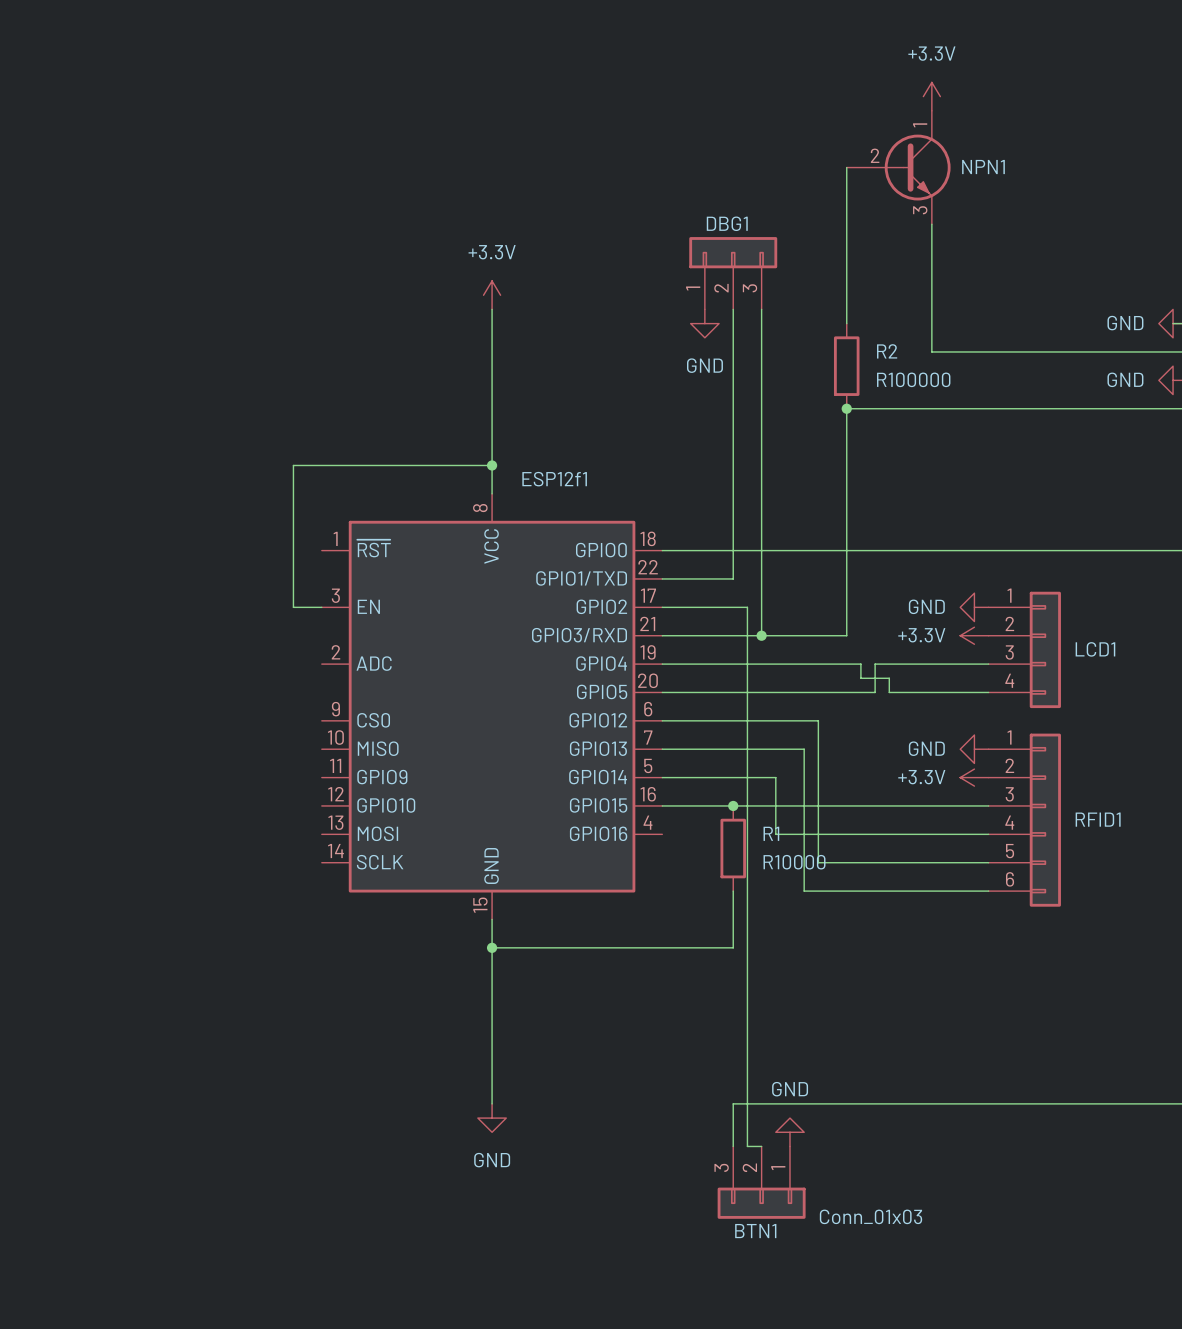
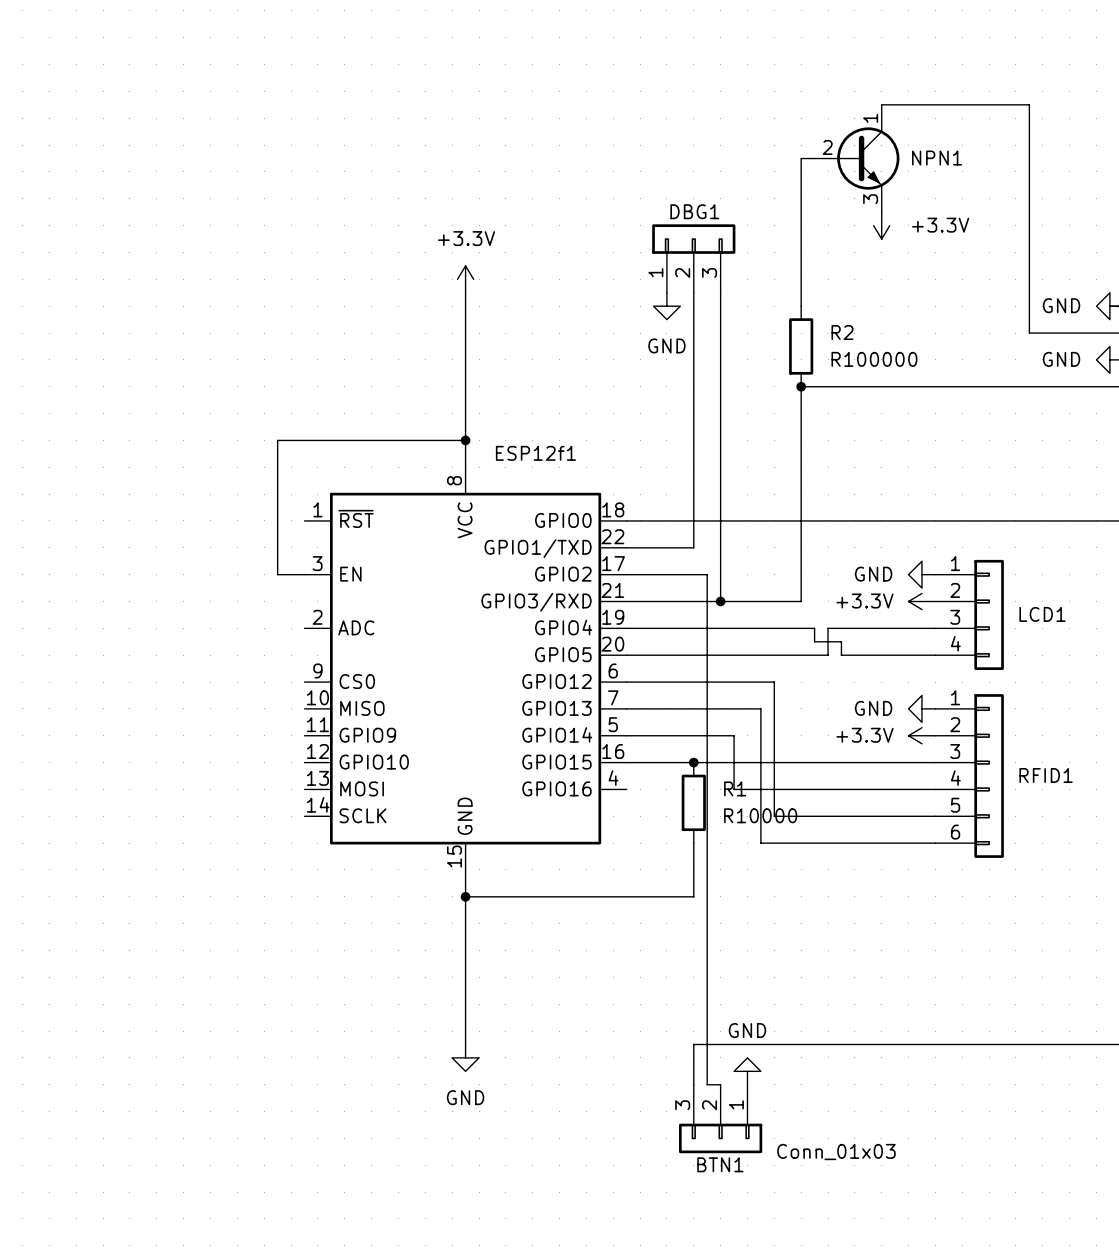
power symbol text position: +3.3V (931, 53) -> +3.3V (940, 225)
power symbol rotation: 0° (931, 96) -> 180° (881, 225)
power symbol position: +3.3V (931, 96) -> +3.3V (881, 225)
wire: (931, 224) (931, 351) (1087, 351) -> (881, 104) (1029, 104) (1029, 333)

